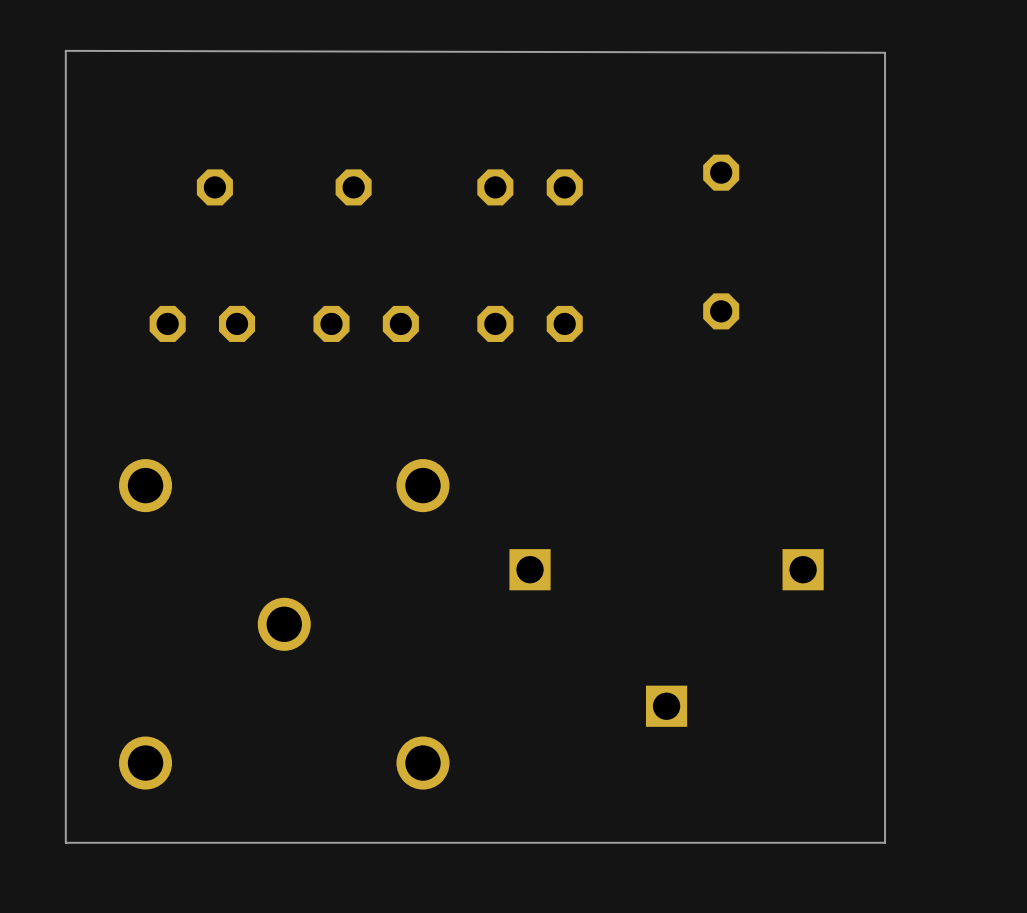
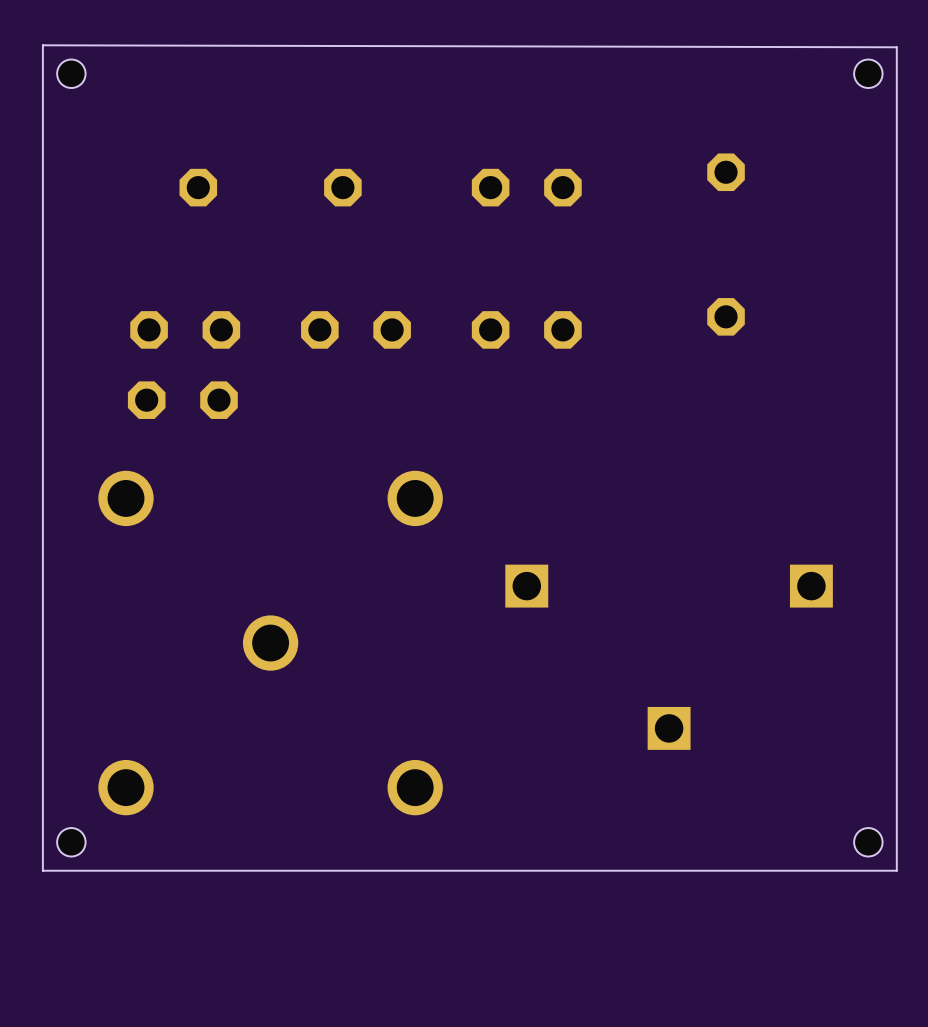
hole: none -> (71, 73)
hole: none -> (868, 73)
part: none -> (182, 400)
hole: none -> (71, 842)
hole: none -> (868, 842)

